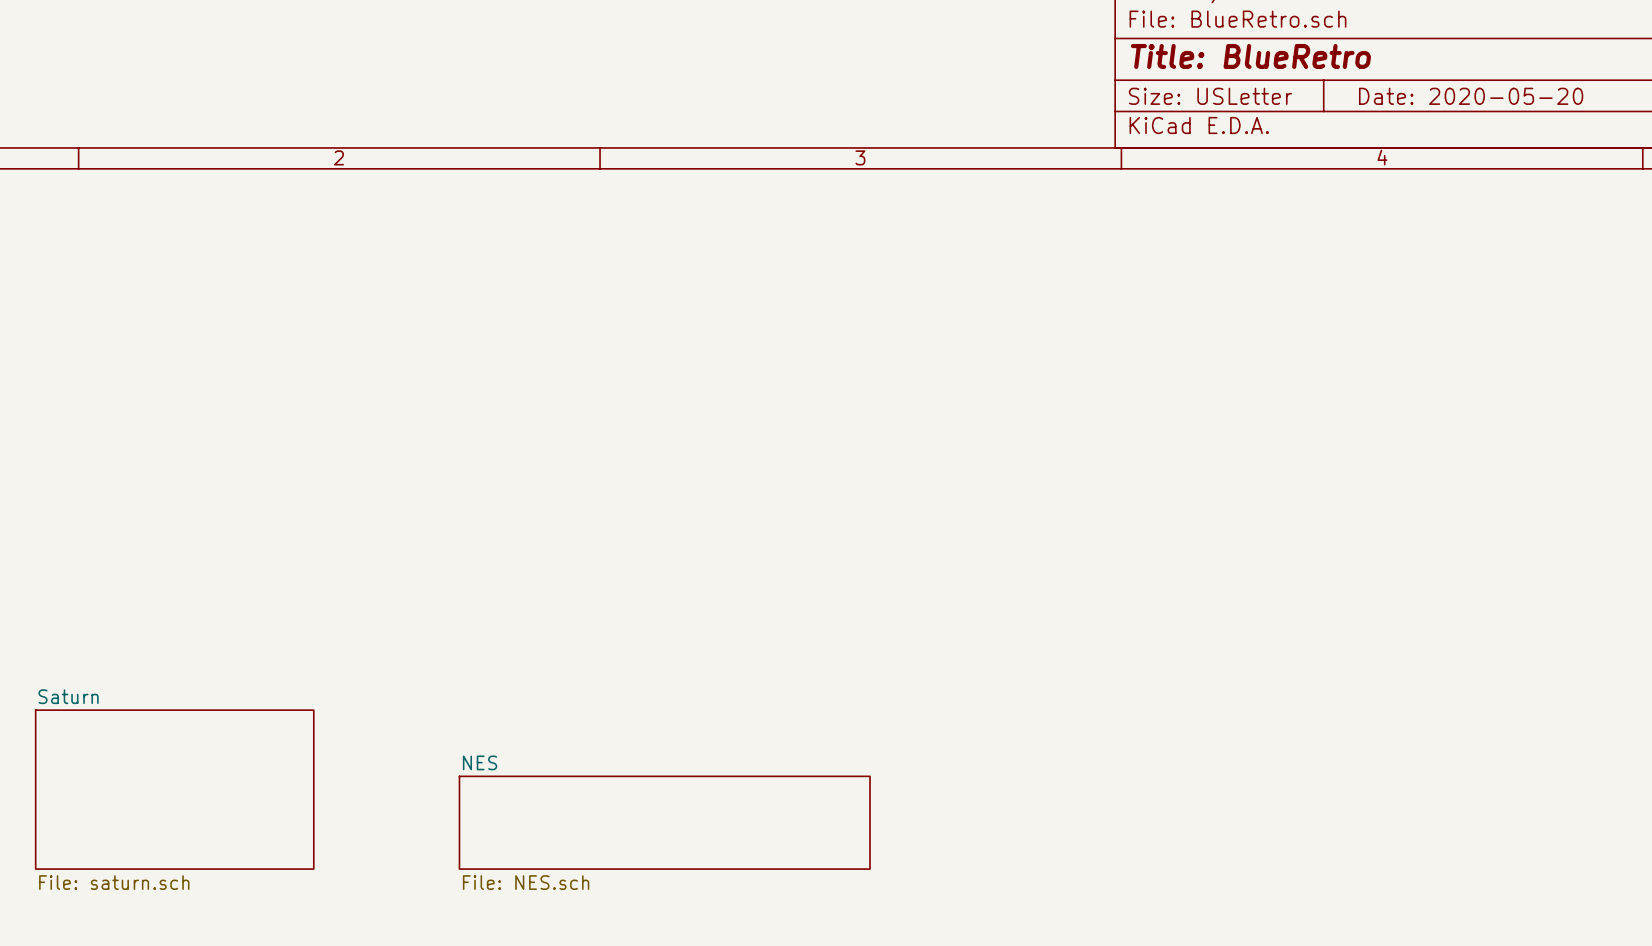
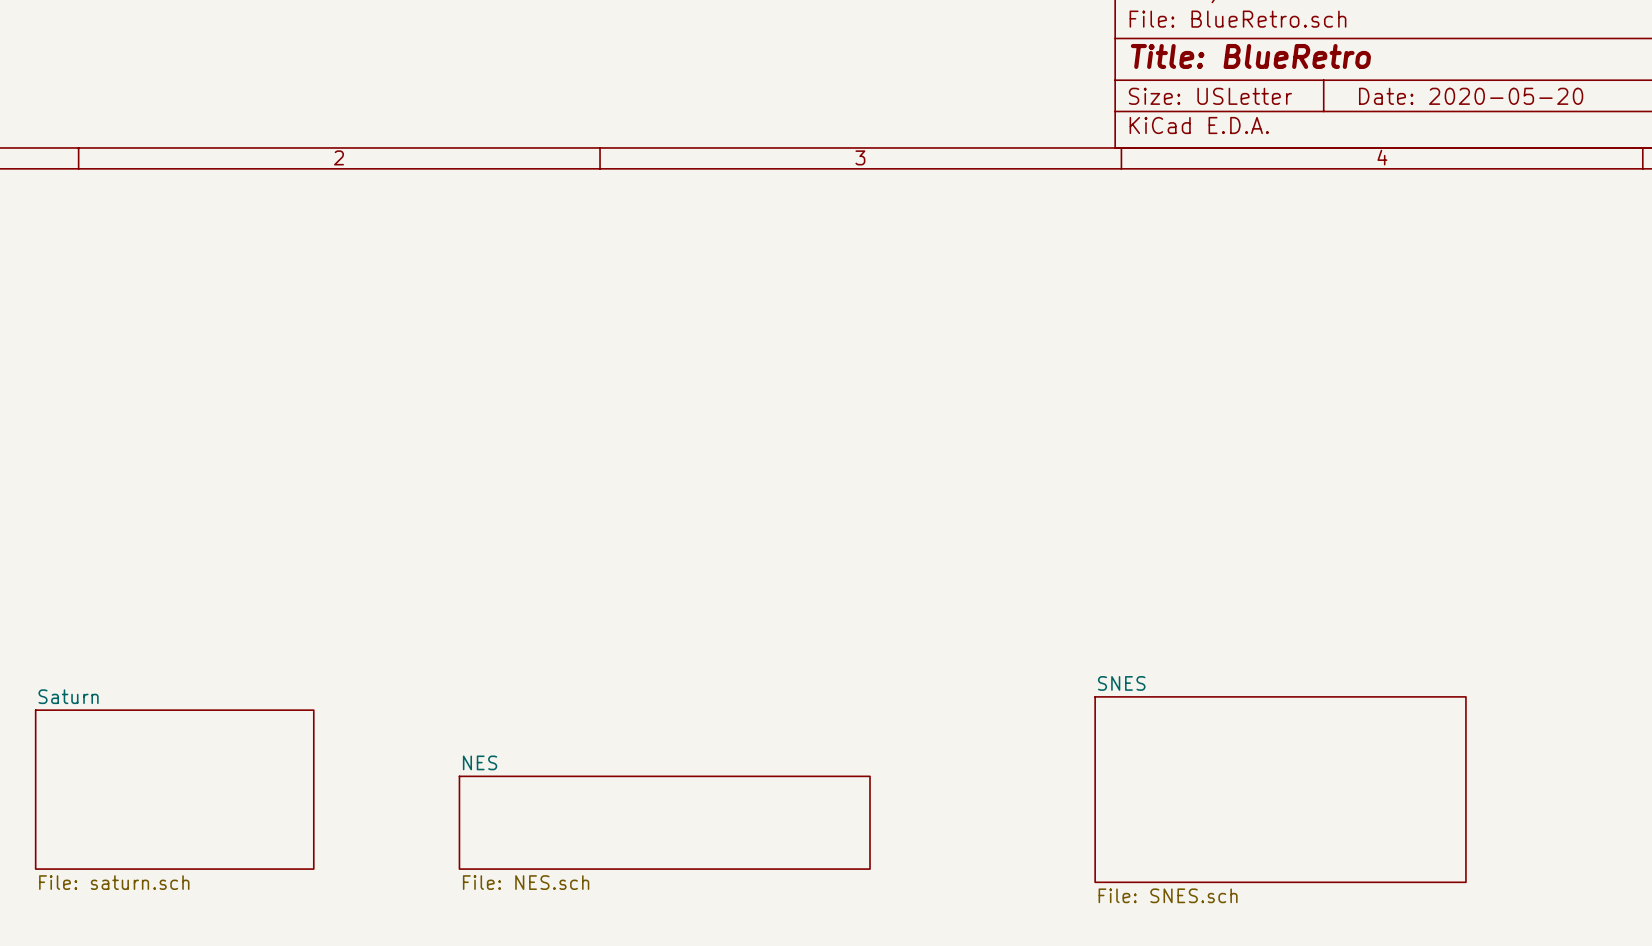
sheet SNES: none -> File: SNES.sch (1280, 789)

